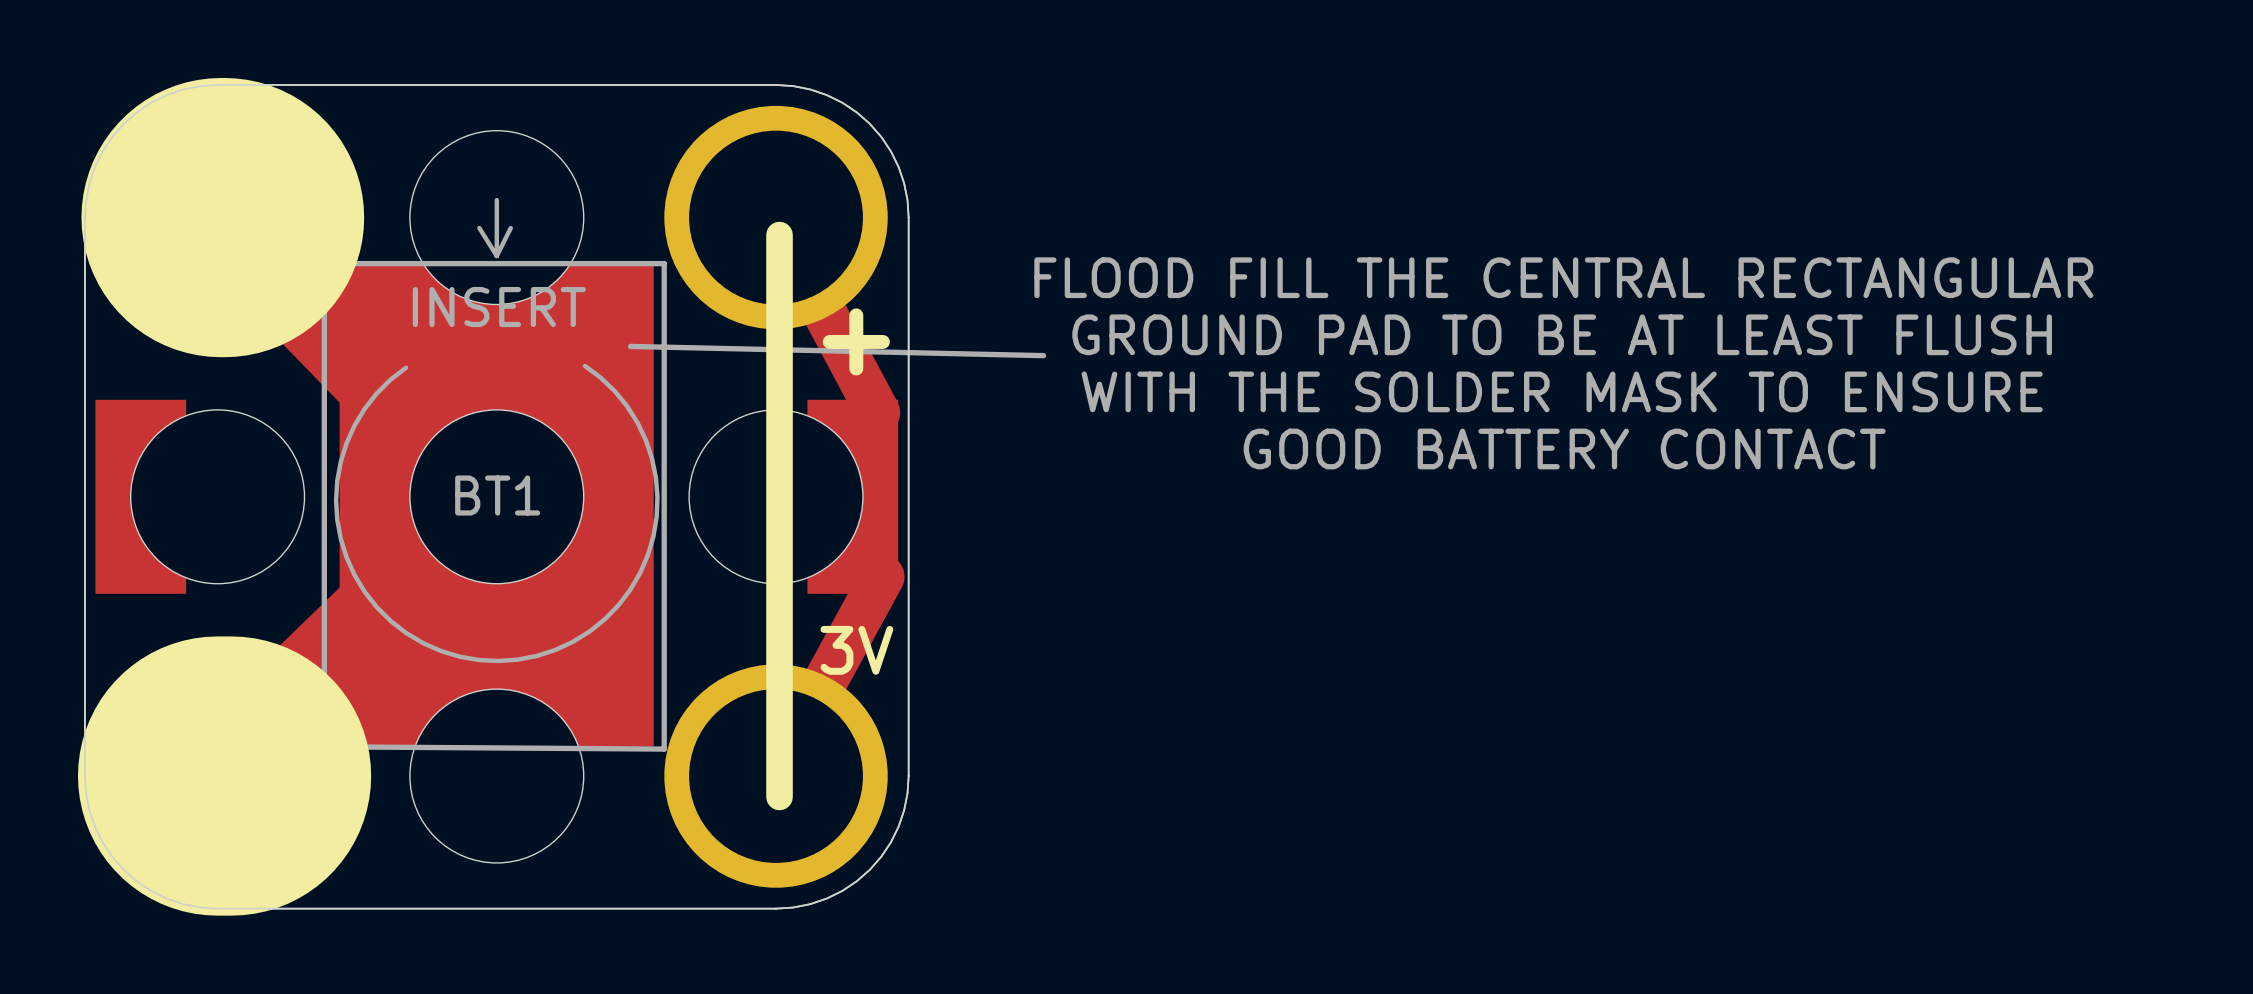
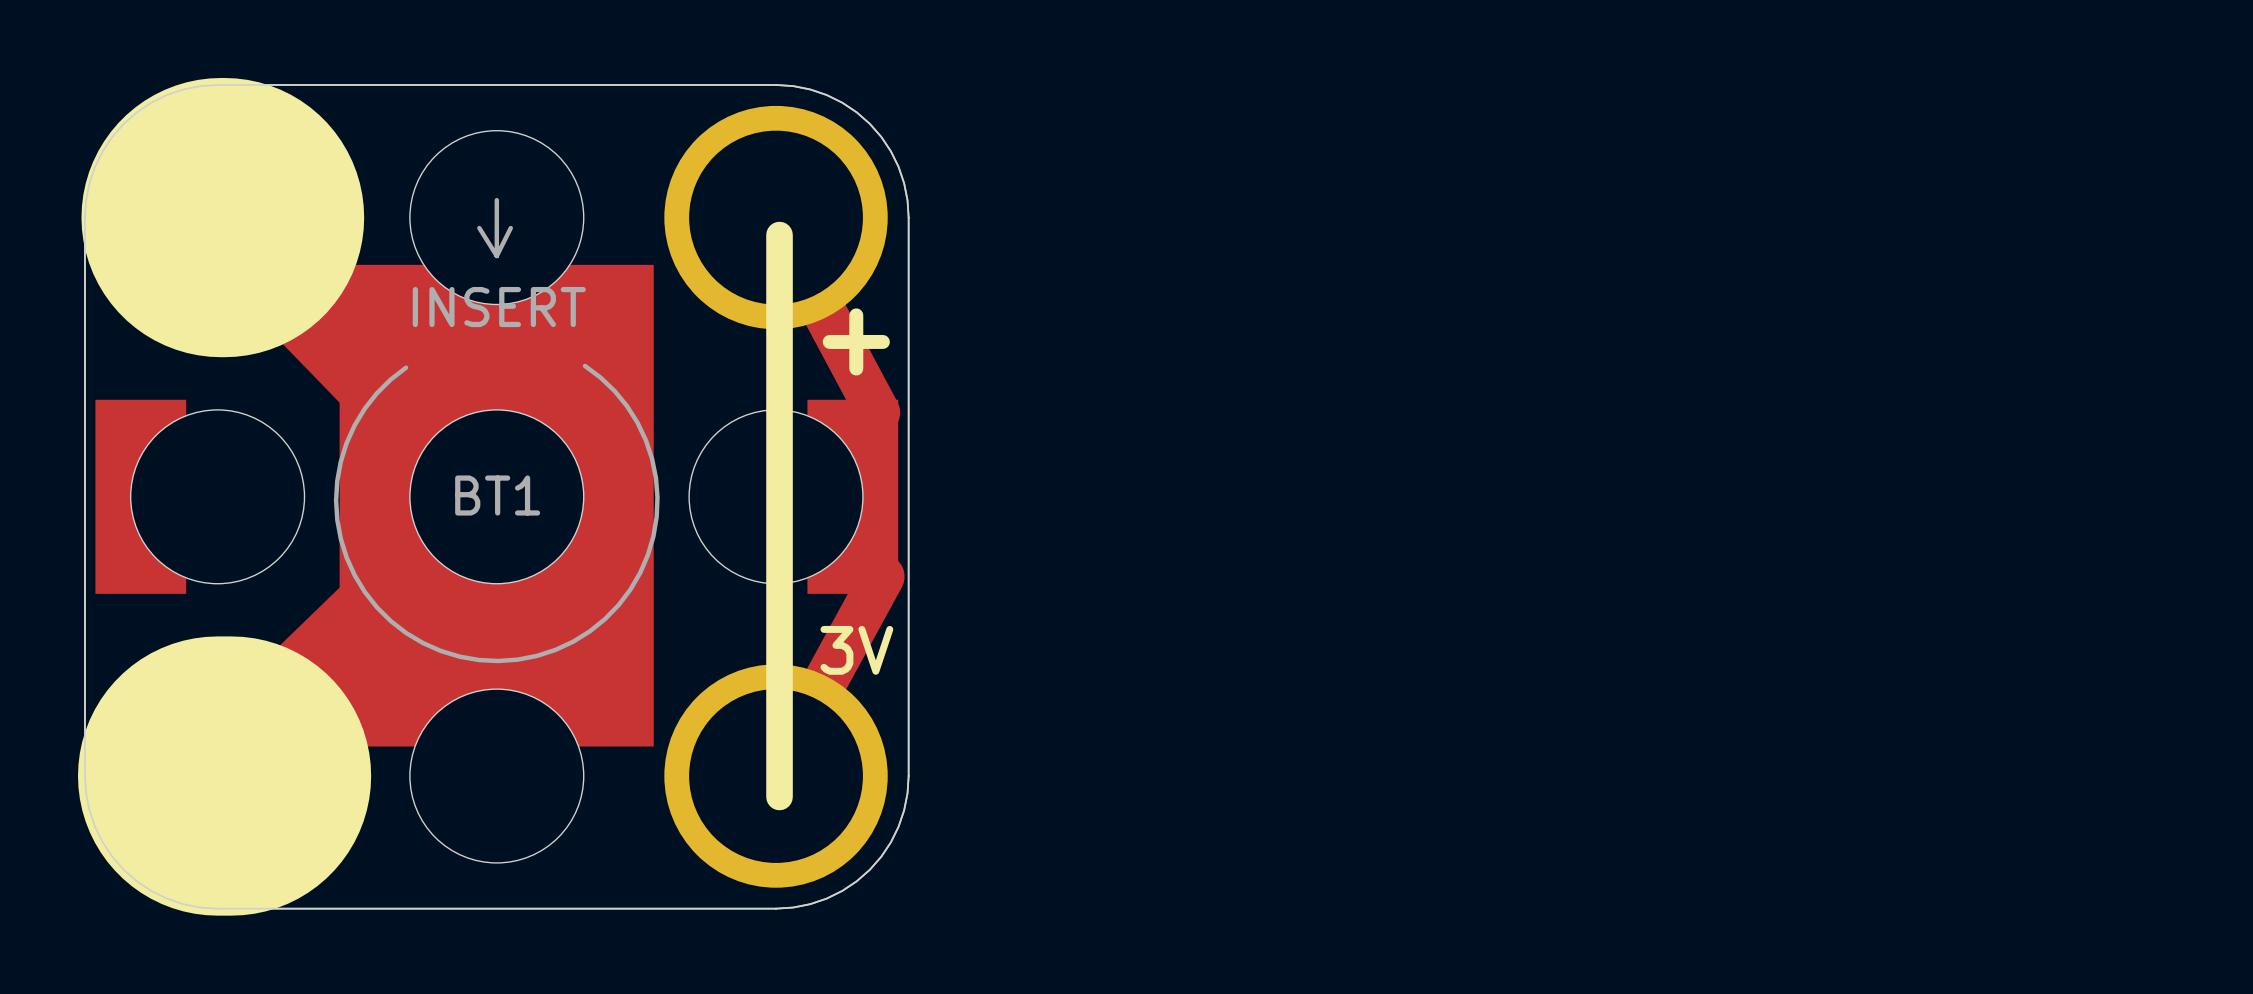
line: (330, 263) (324, 263) (324, 746) (664, 749) (664, 263) (331, 263) -> none
text: FLOOD FILL THE CENTRAL RECTANGULAR (1563, 277) -> none
text: GROUND PAD TO BE AT LEAST FLUSH (1562, 334) -> none
line: (630, 346) (1043, 355) -> none
text: WITH THE SOLDER MASK TO ENSURE (1562, 391) -> none
text: GOOD BATTERY CONTACT (1564, 449) -> none

